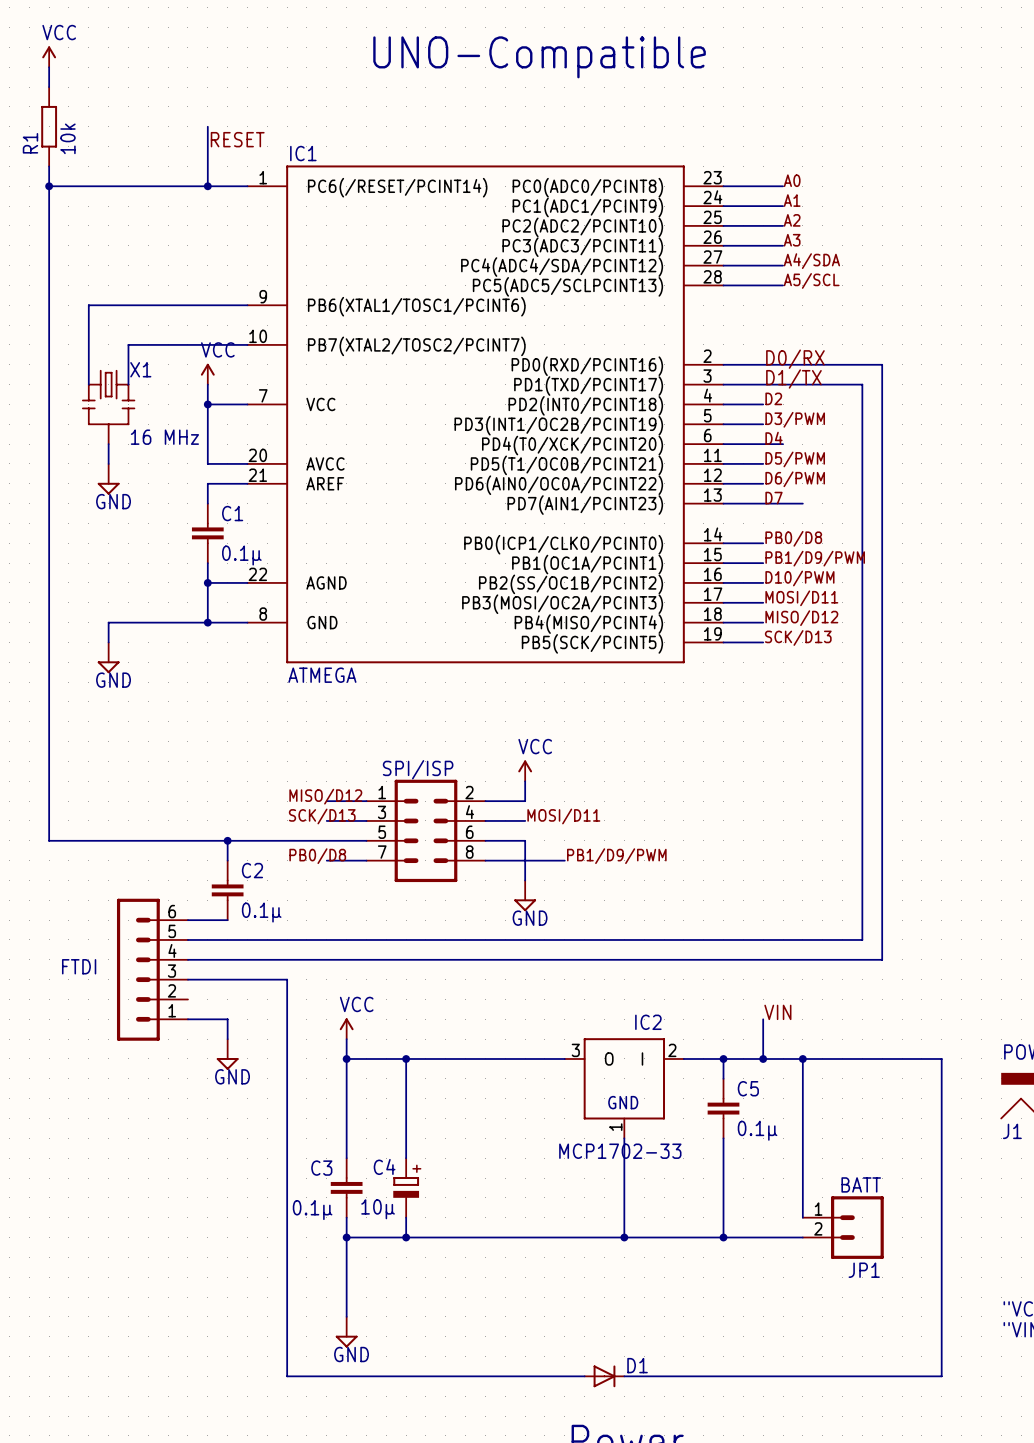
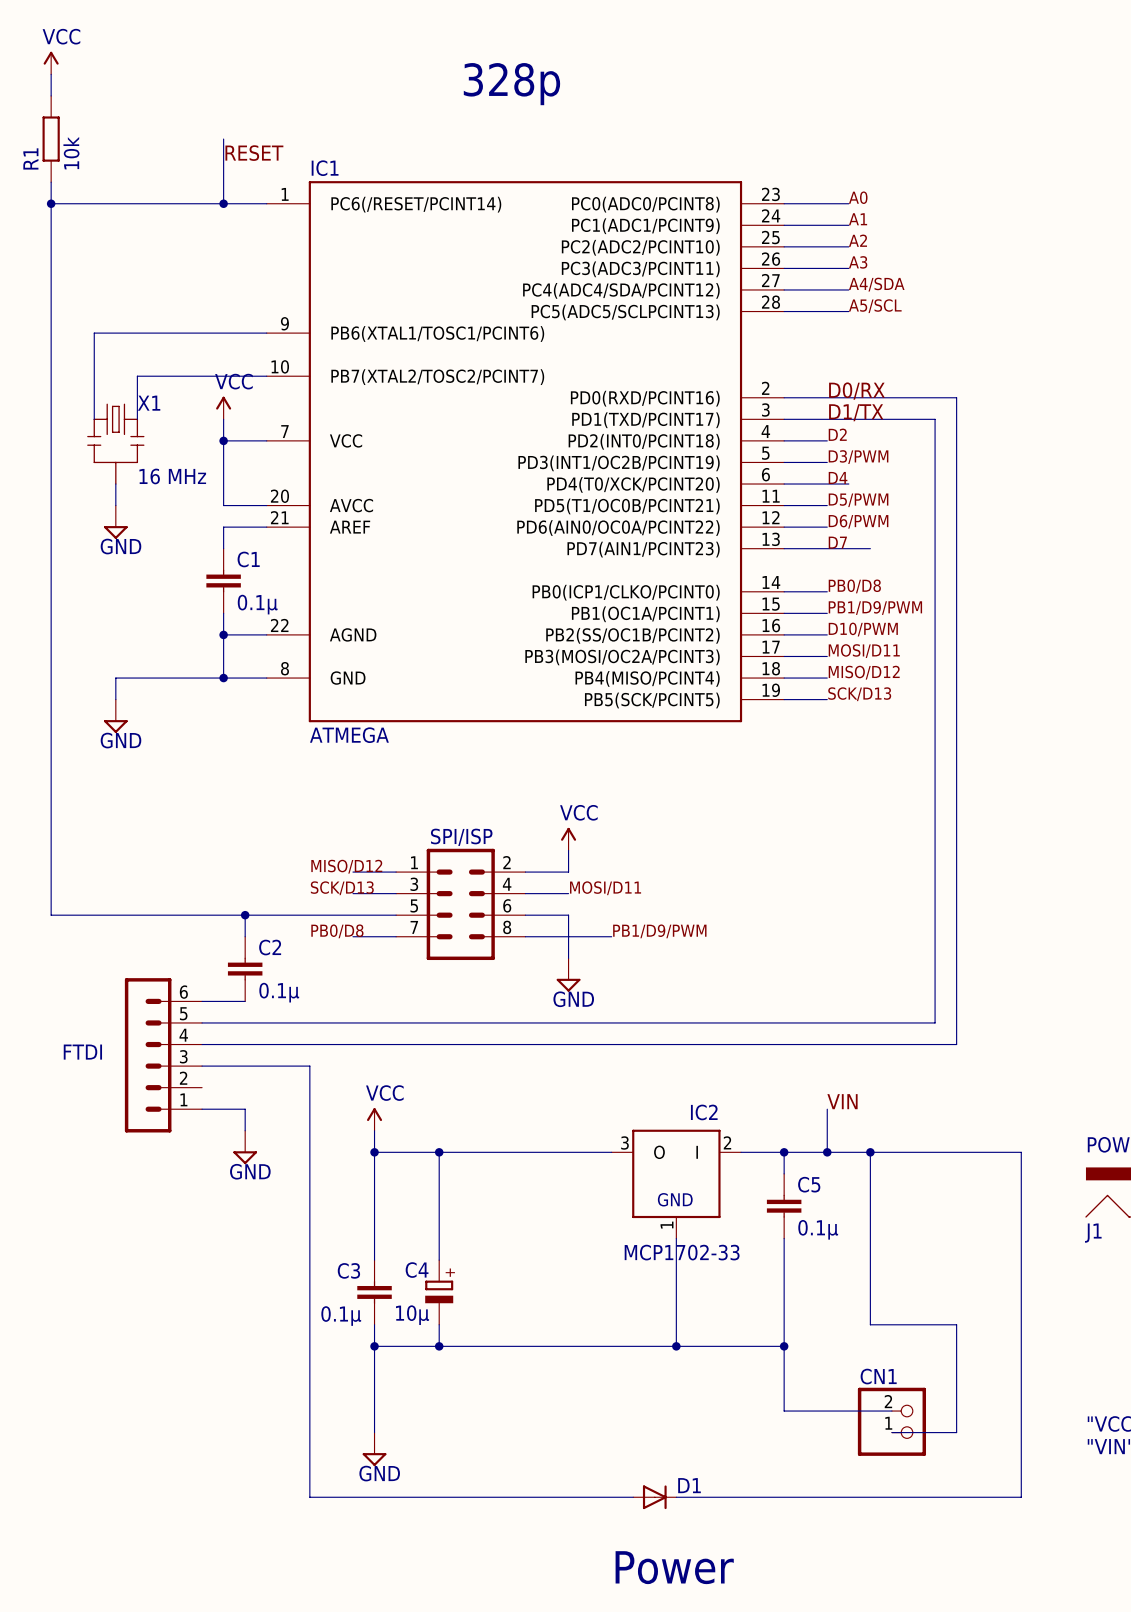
text: UNO-Compatible (539, 57) -> none
text: none -> 328p (511, 84)
wire: none -> (870, 1324) (956, 1324) (956, 1432) (891, 1432)
JP1: BATT (843, 1227) -> none
wire: (723, 1237) (802, 1237) -> (784, 1346) (784, 1411) (891, 1411)
CN1: none -> (891, 1421)

